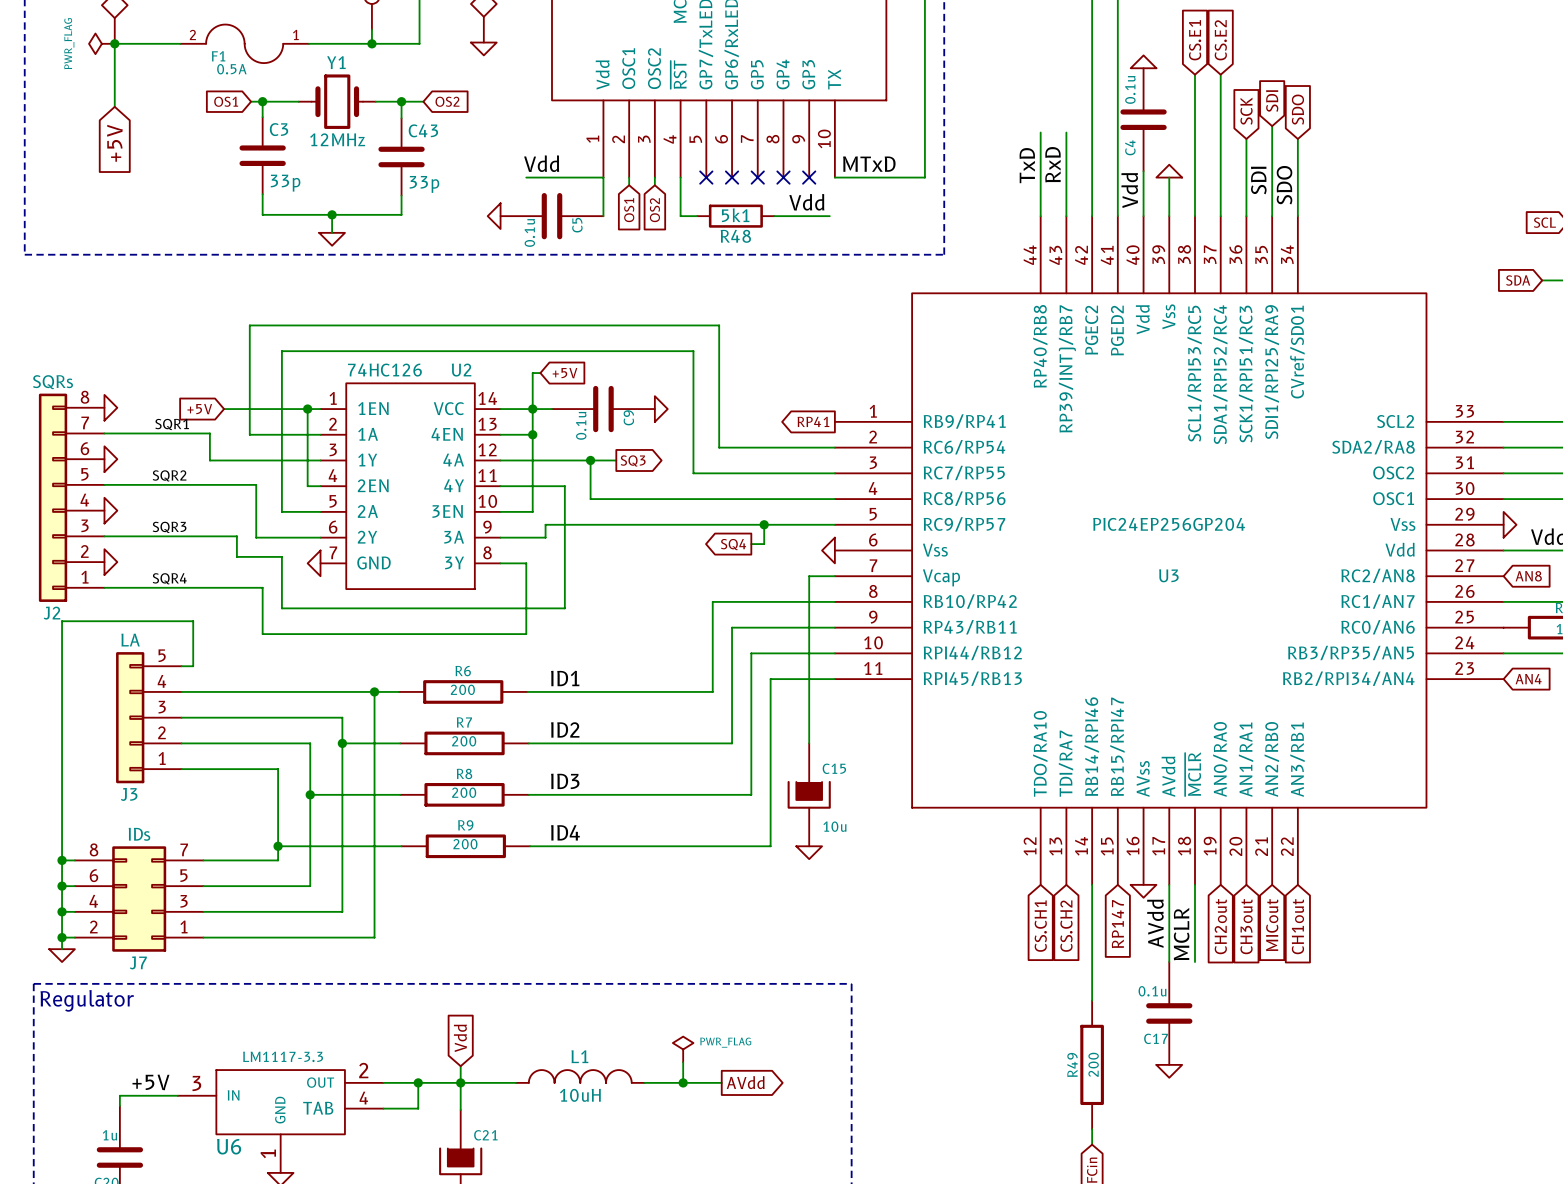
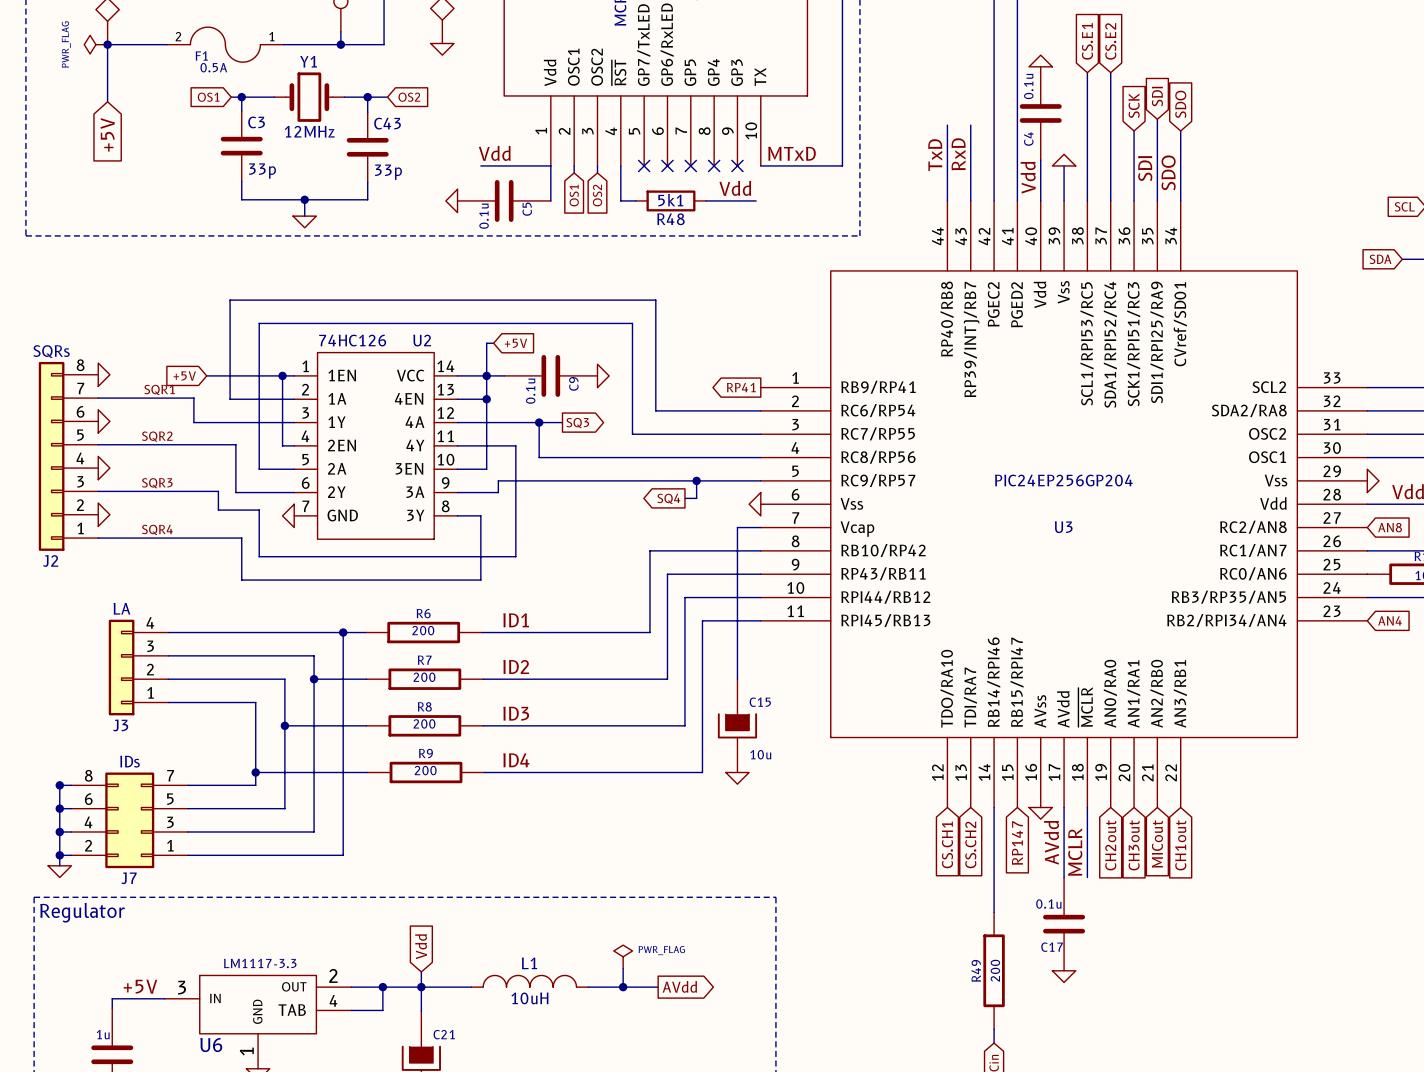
J3 symbol: [116, 652, 182, 784] -> [108, 619, 169, 716]
wire: (181, 666) (193, 666) (193, 621) (62, 621) (62, 860) -> none

